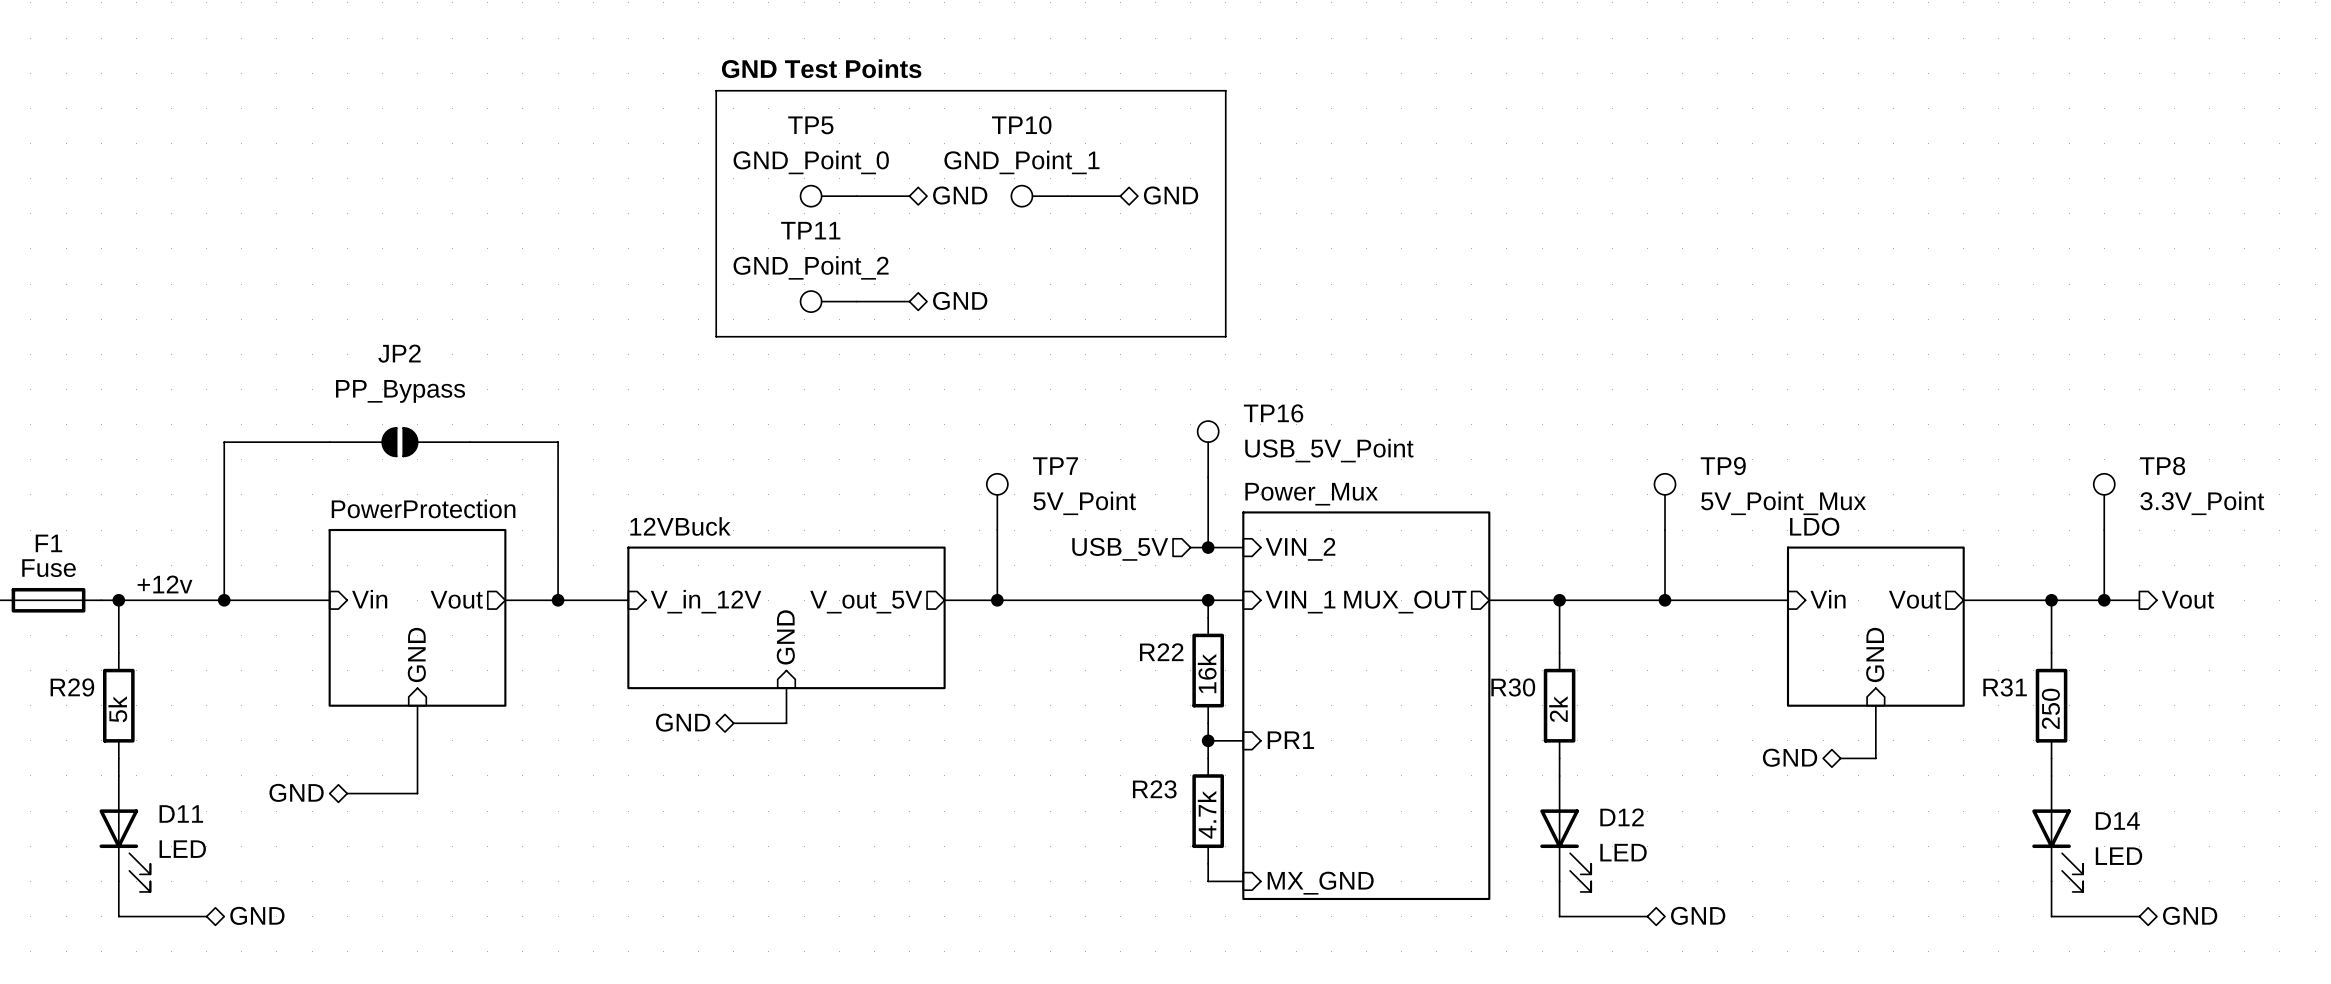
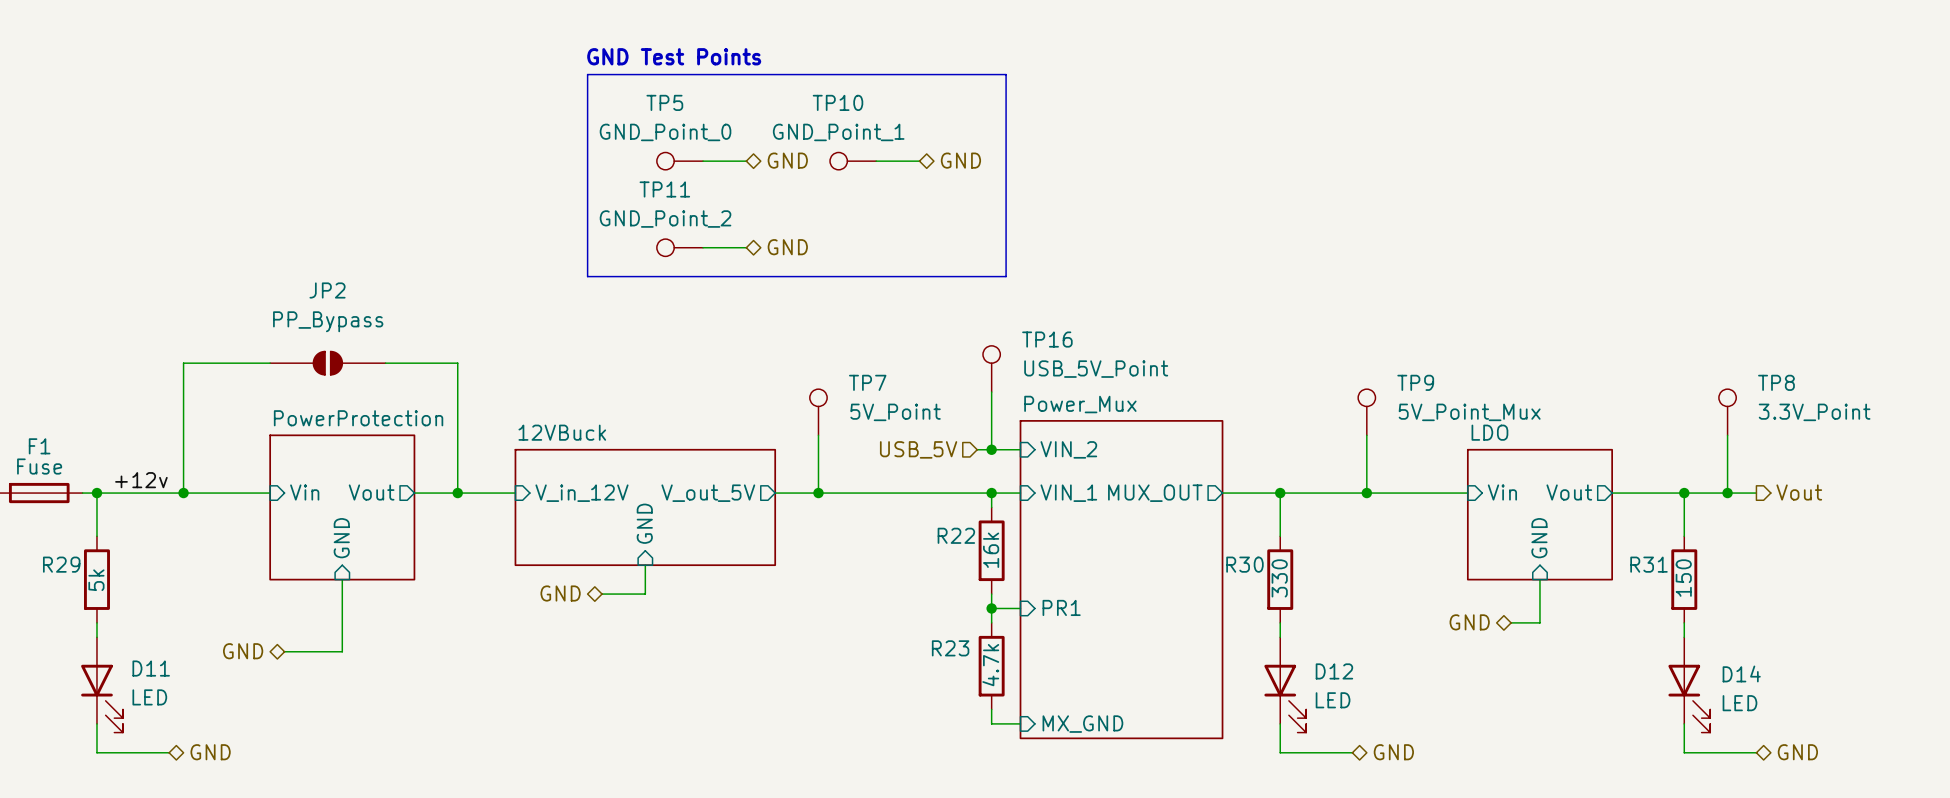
R31 value: 250 (2050, 708) -> 150 (1683, 578)
R30 value: 2k (1558, 709) -> 330 (1279, 578)

